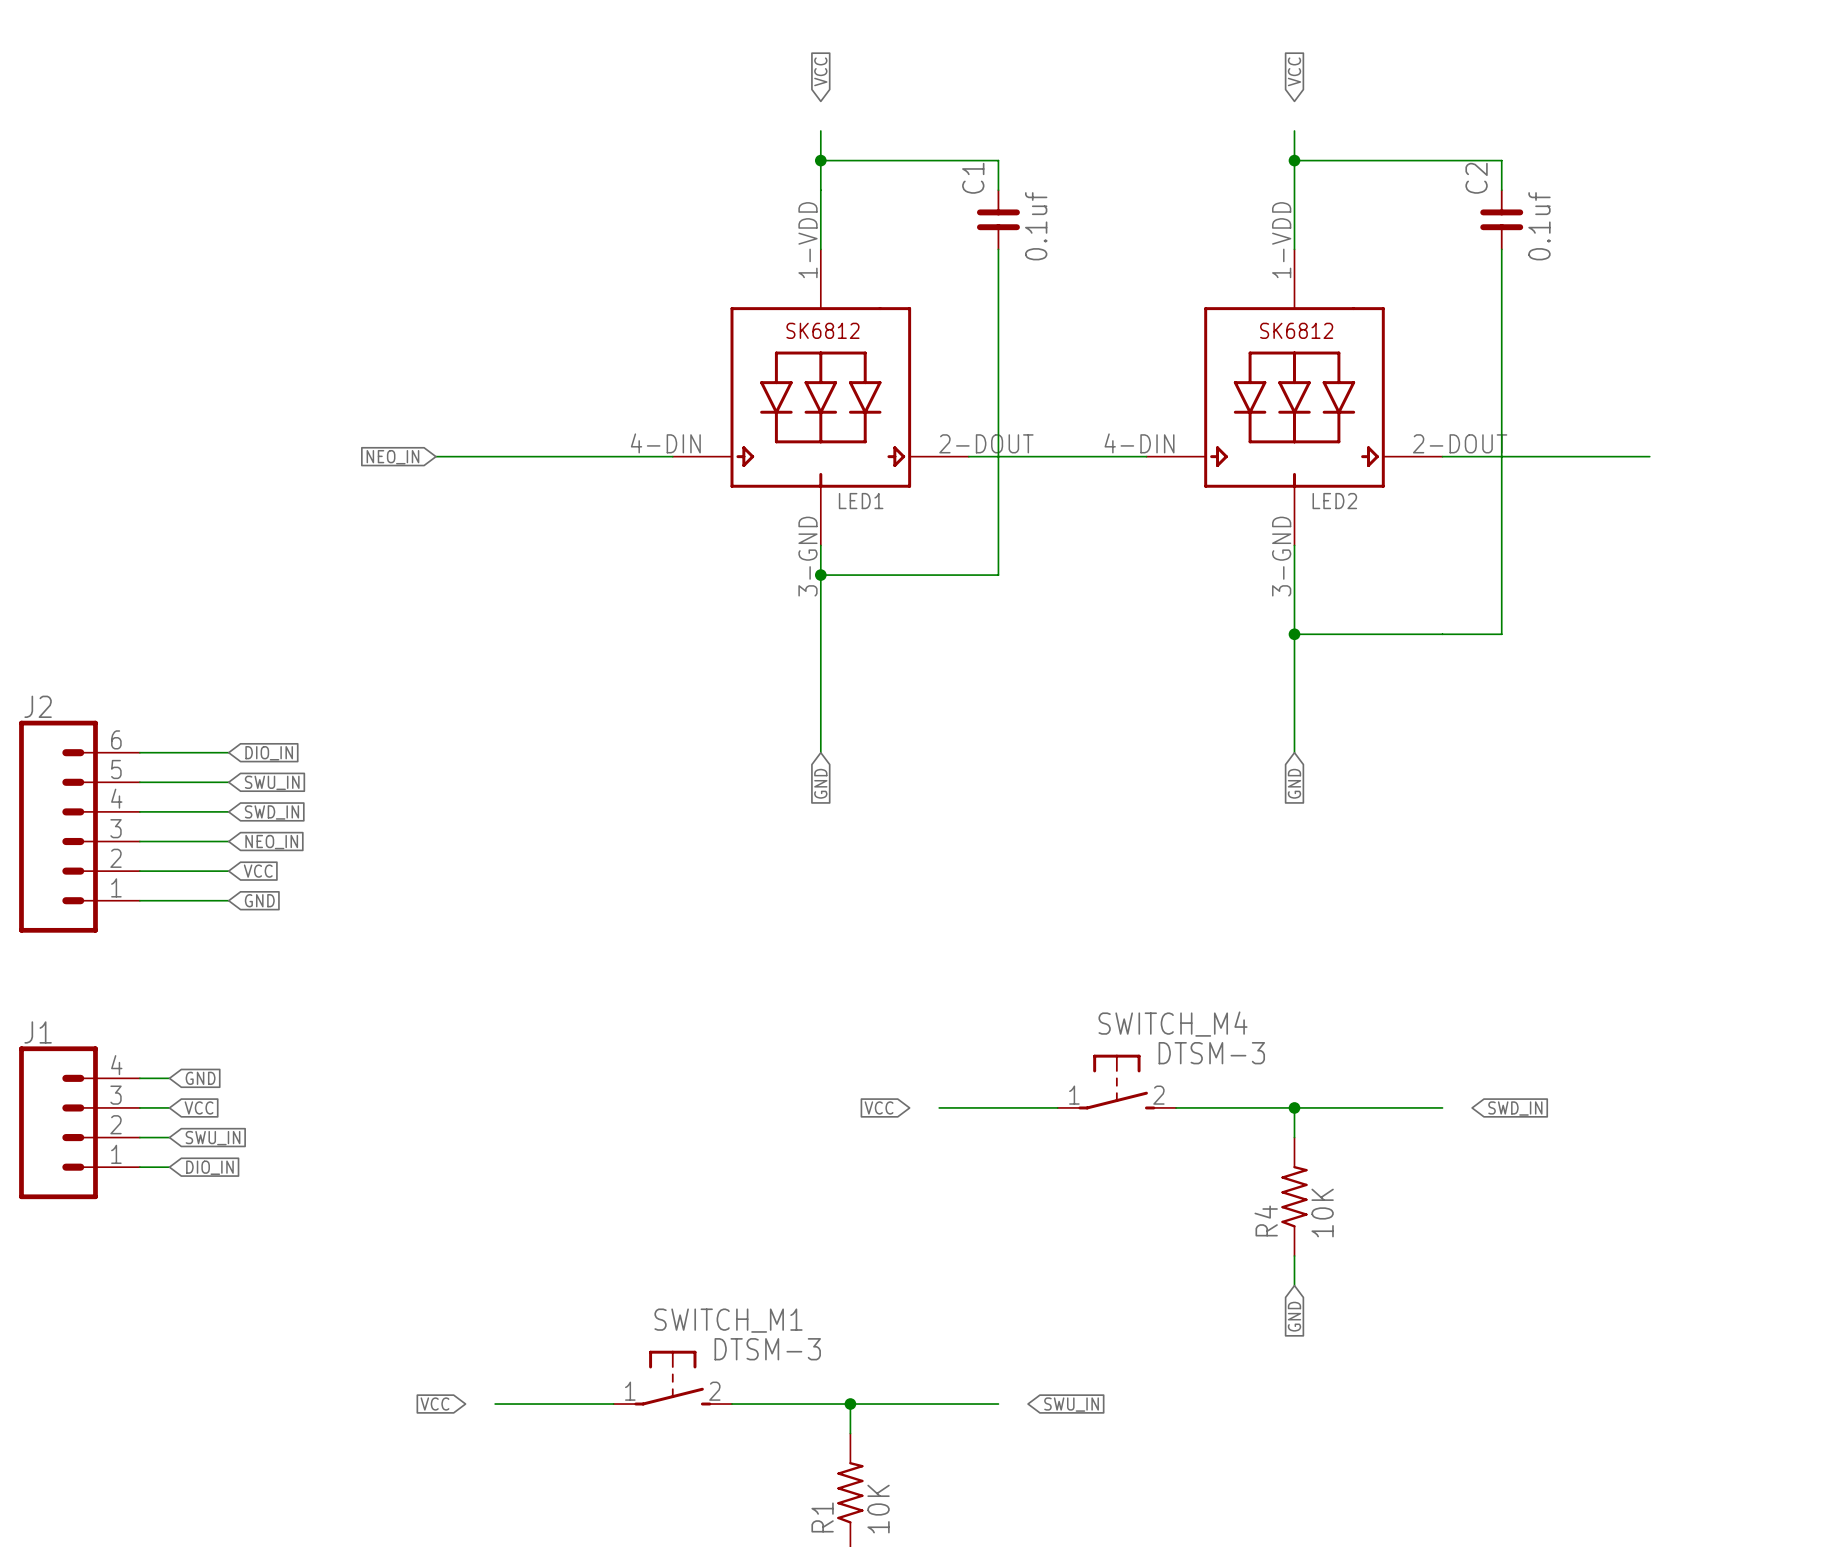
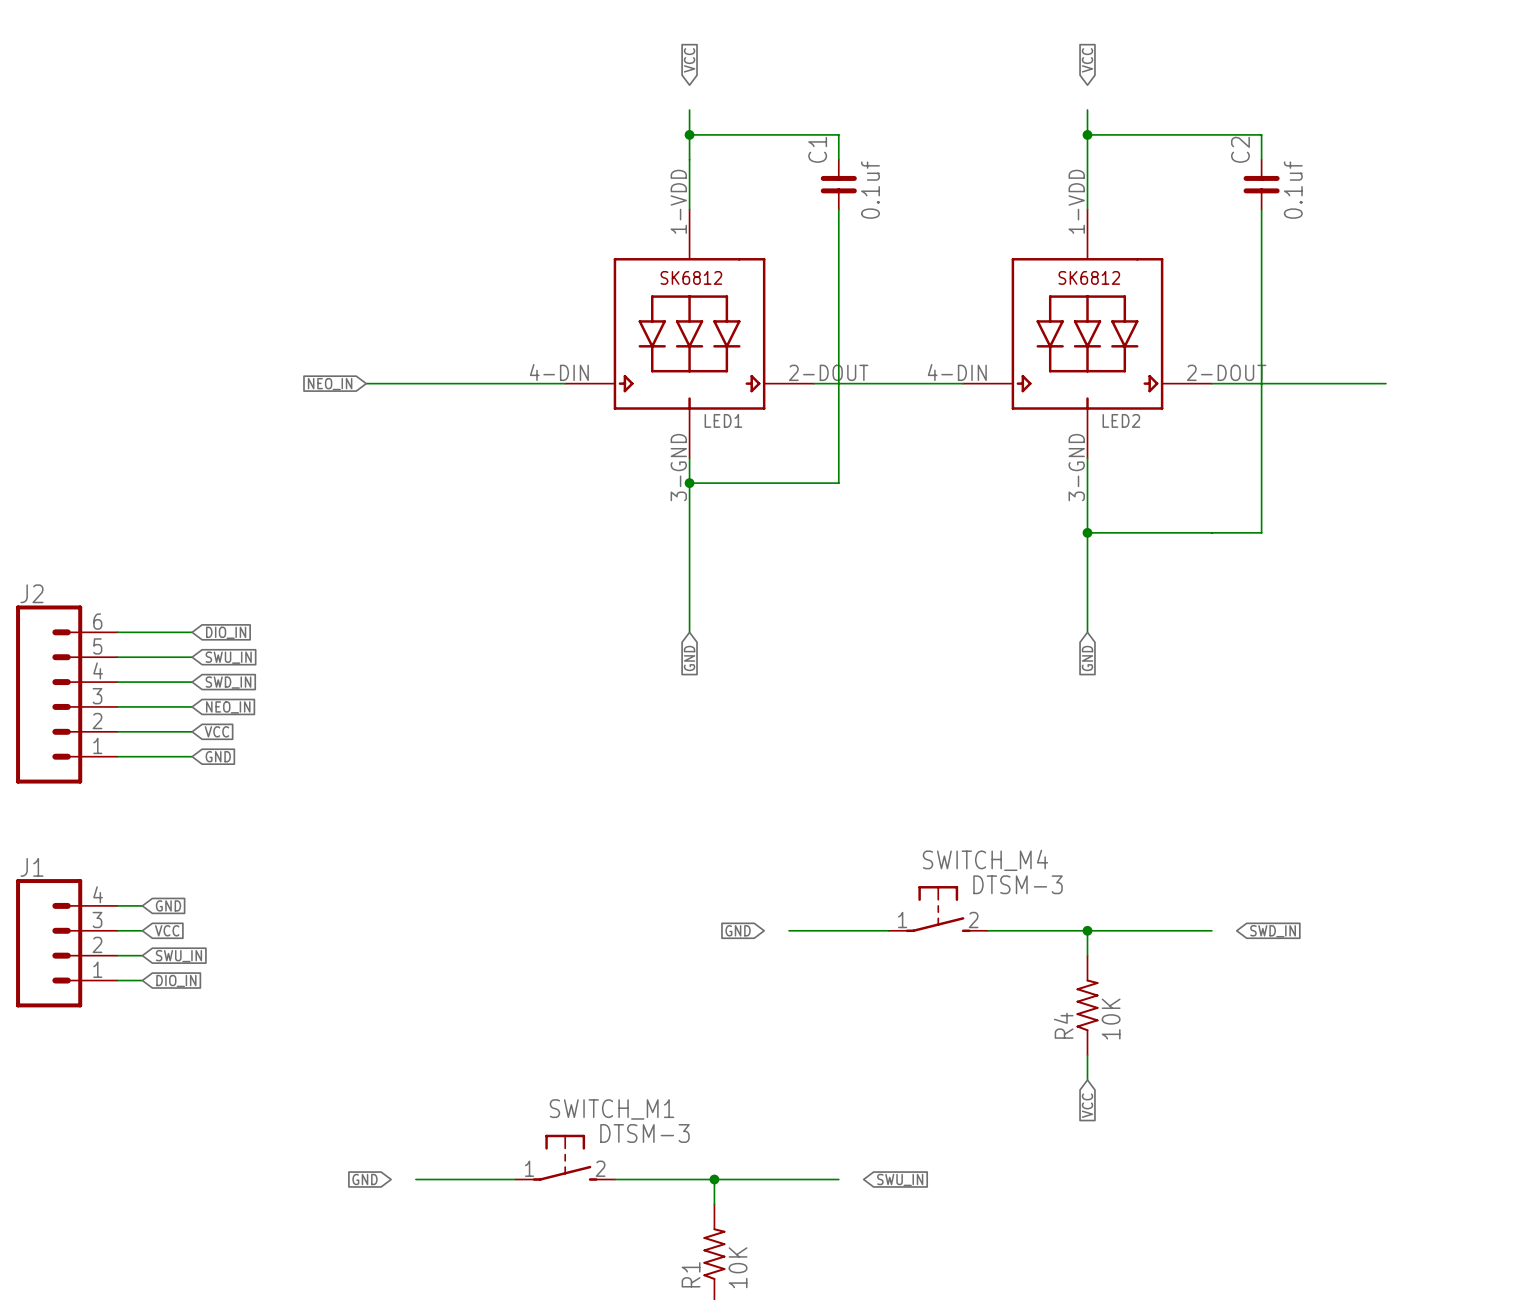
global label: VCC (879, 1107) -> GND (738, 930)
global label: GND (1294, 1316) -> VCC (1087, 1105)
global label: VCC (434, 1404) -> GND (365, 1179)

